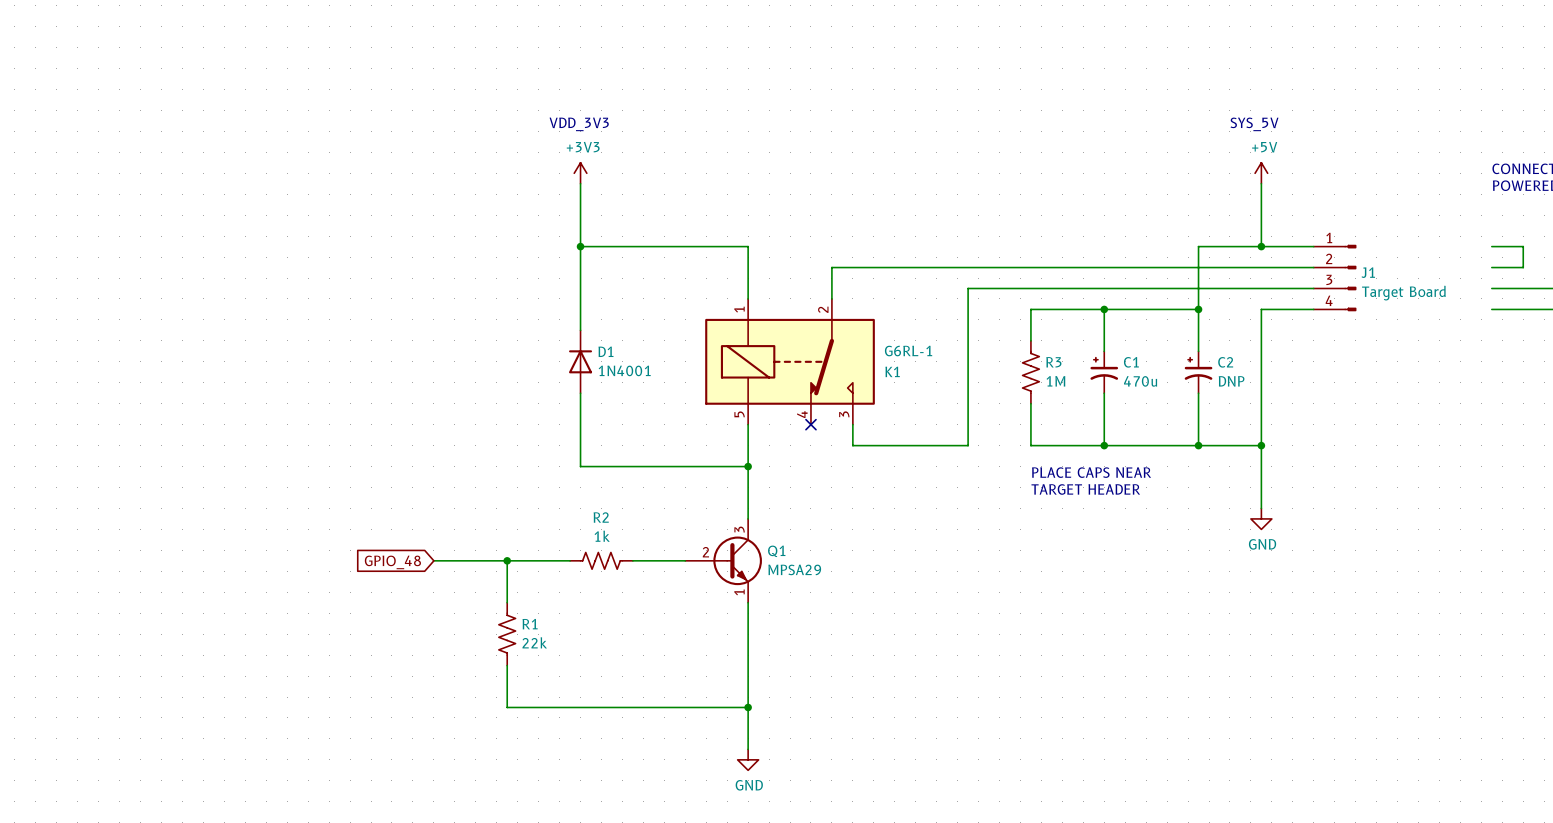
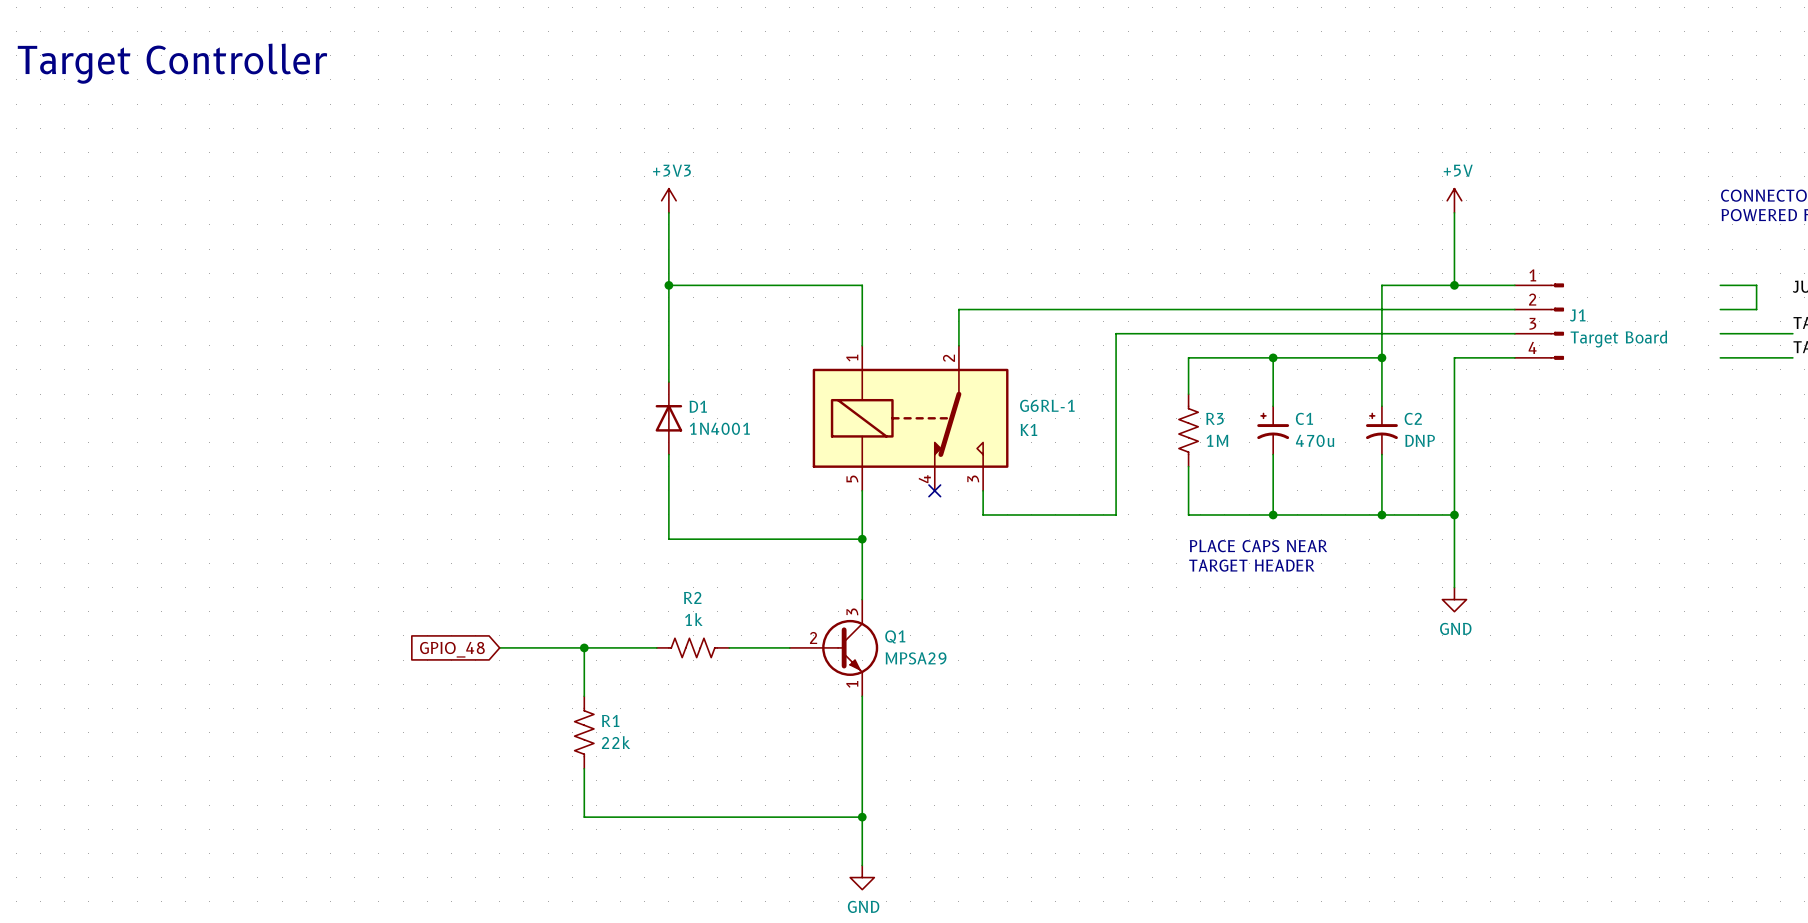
text: none -> Target Controller (172, 63)
text: VDD_3V3 (579, 124) -> none
text: SYS_5V (1254, 124) -> none

